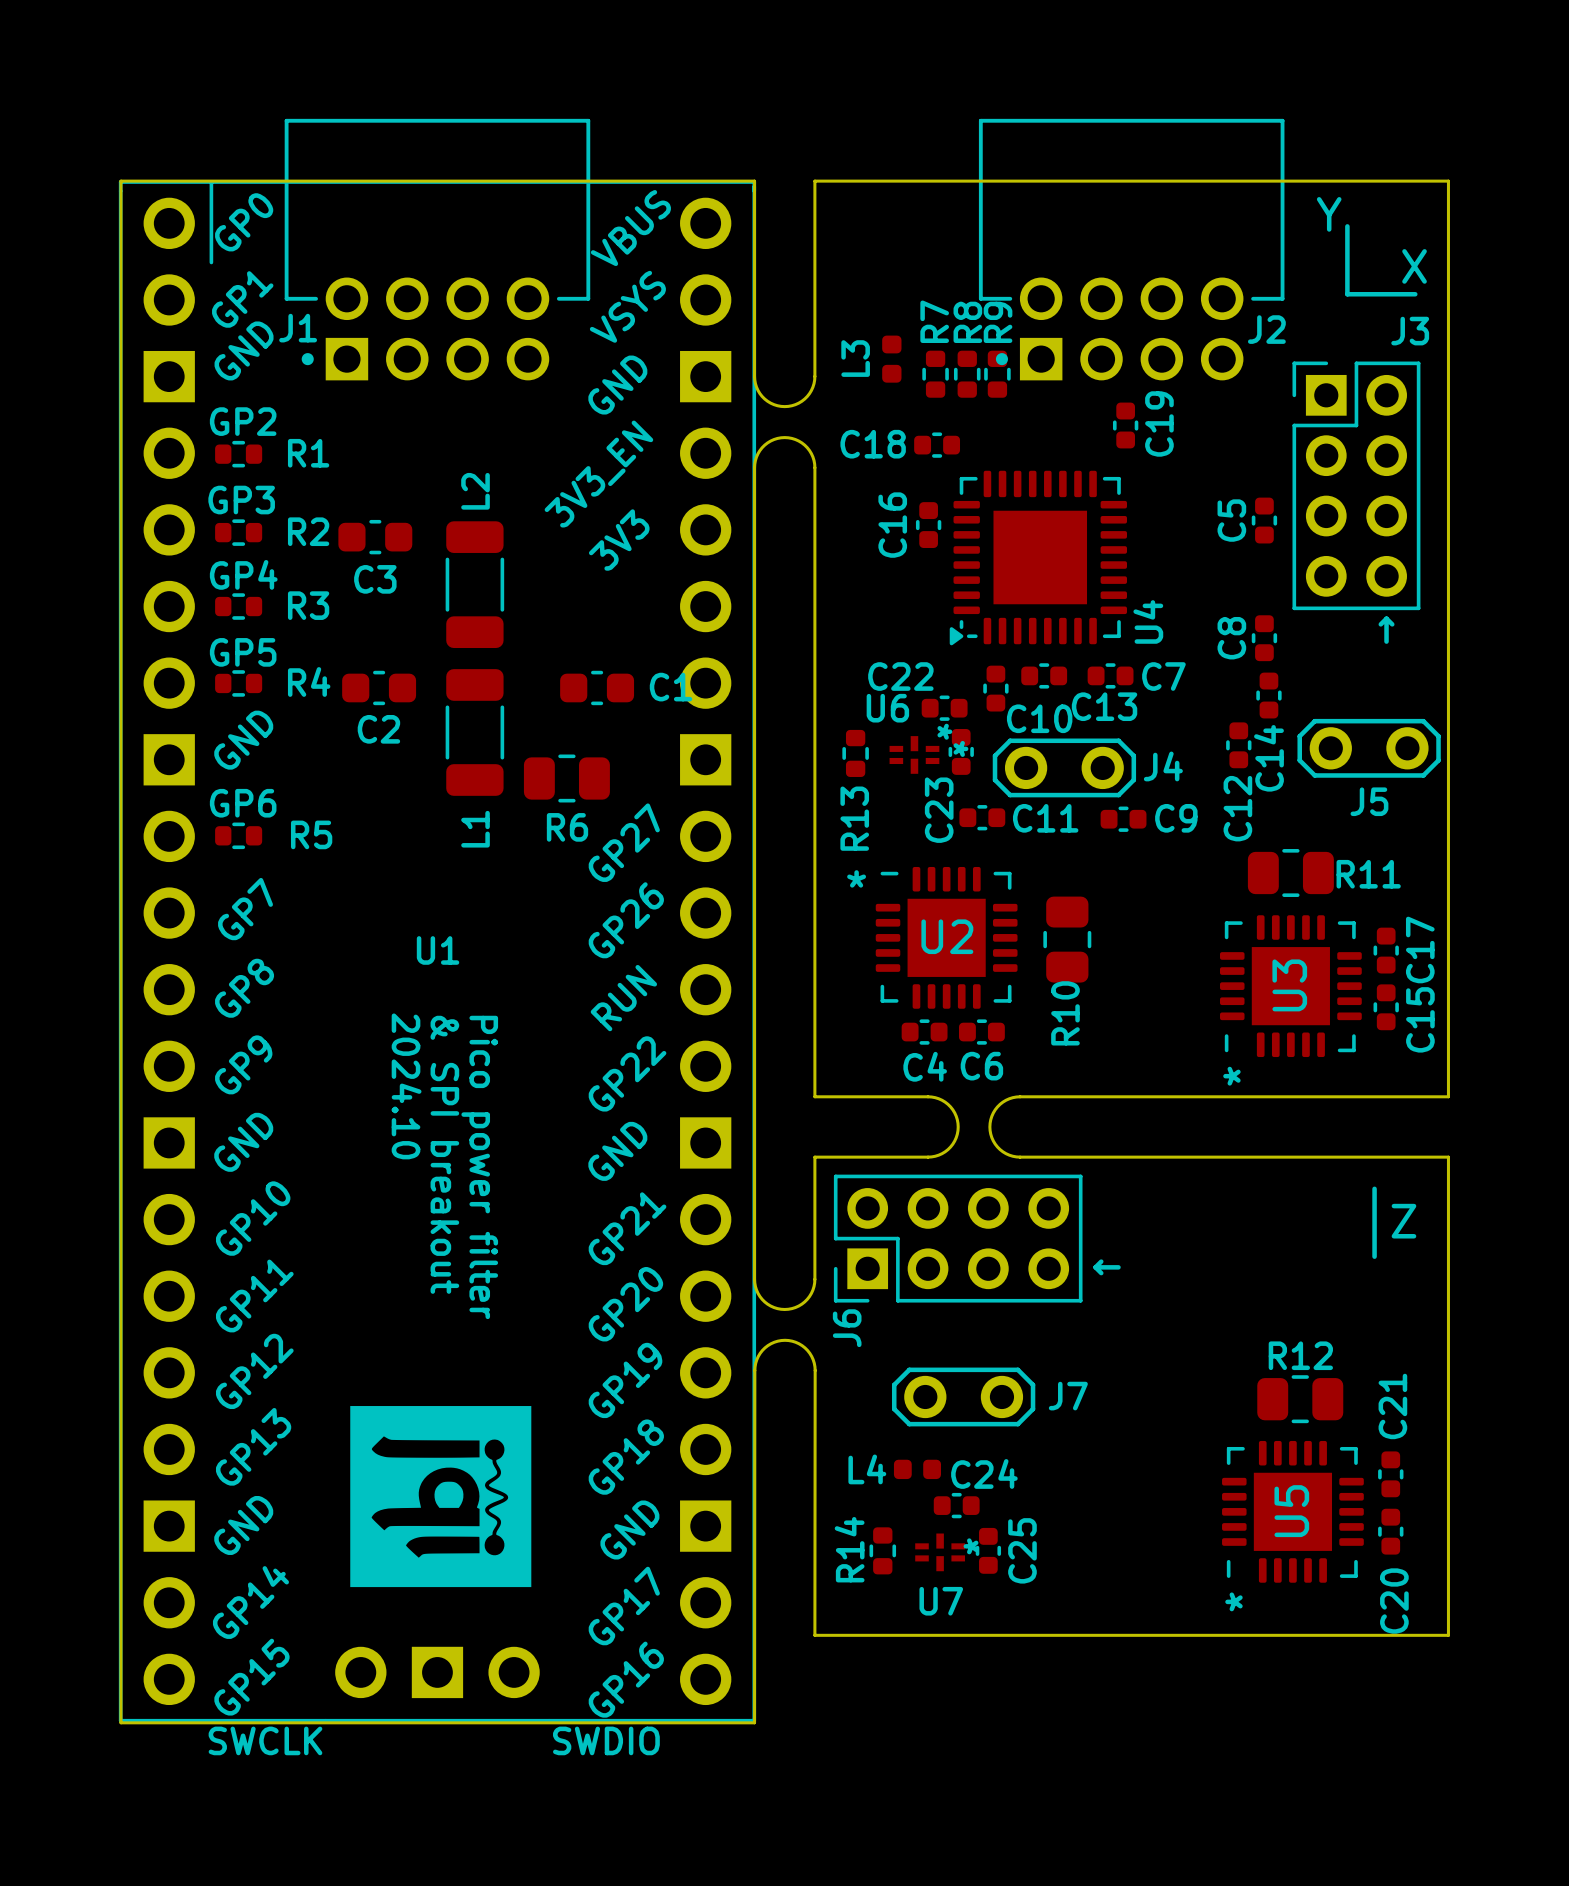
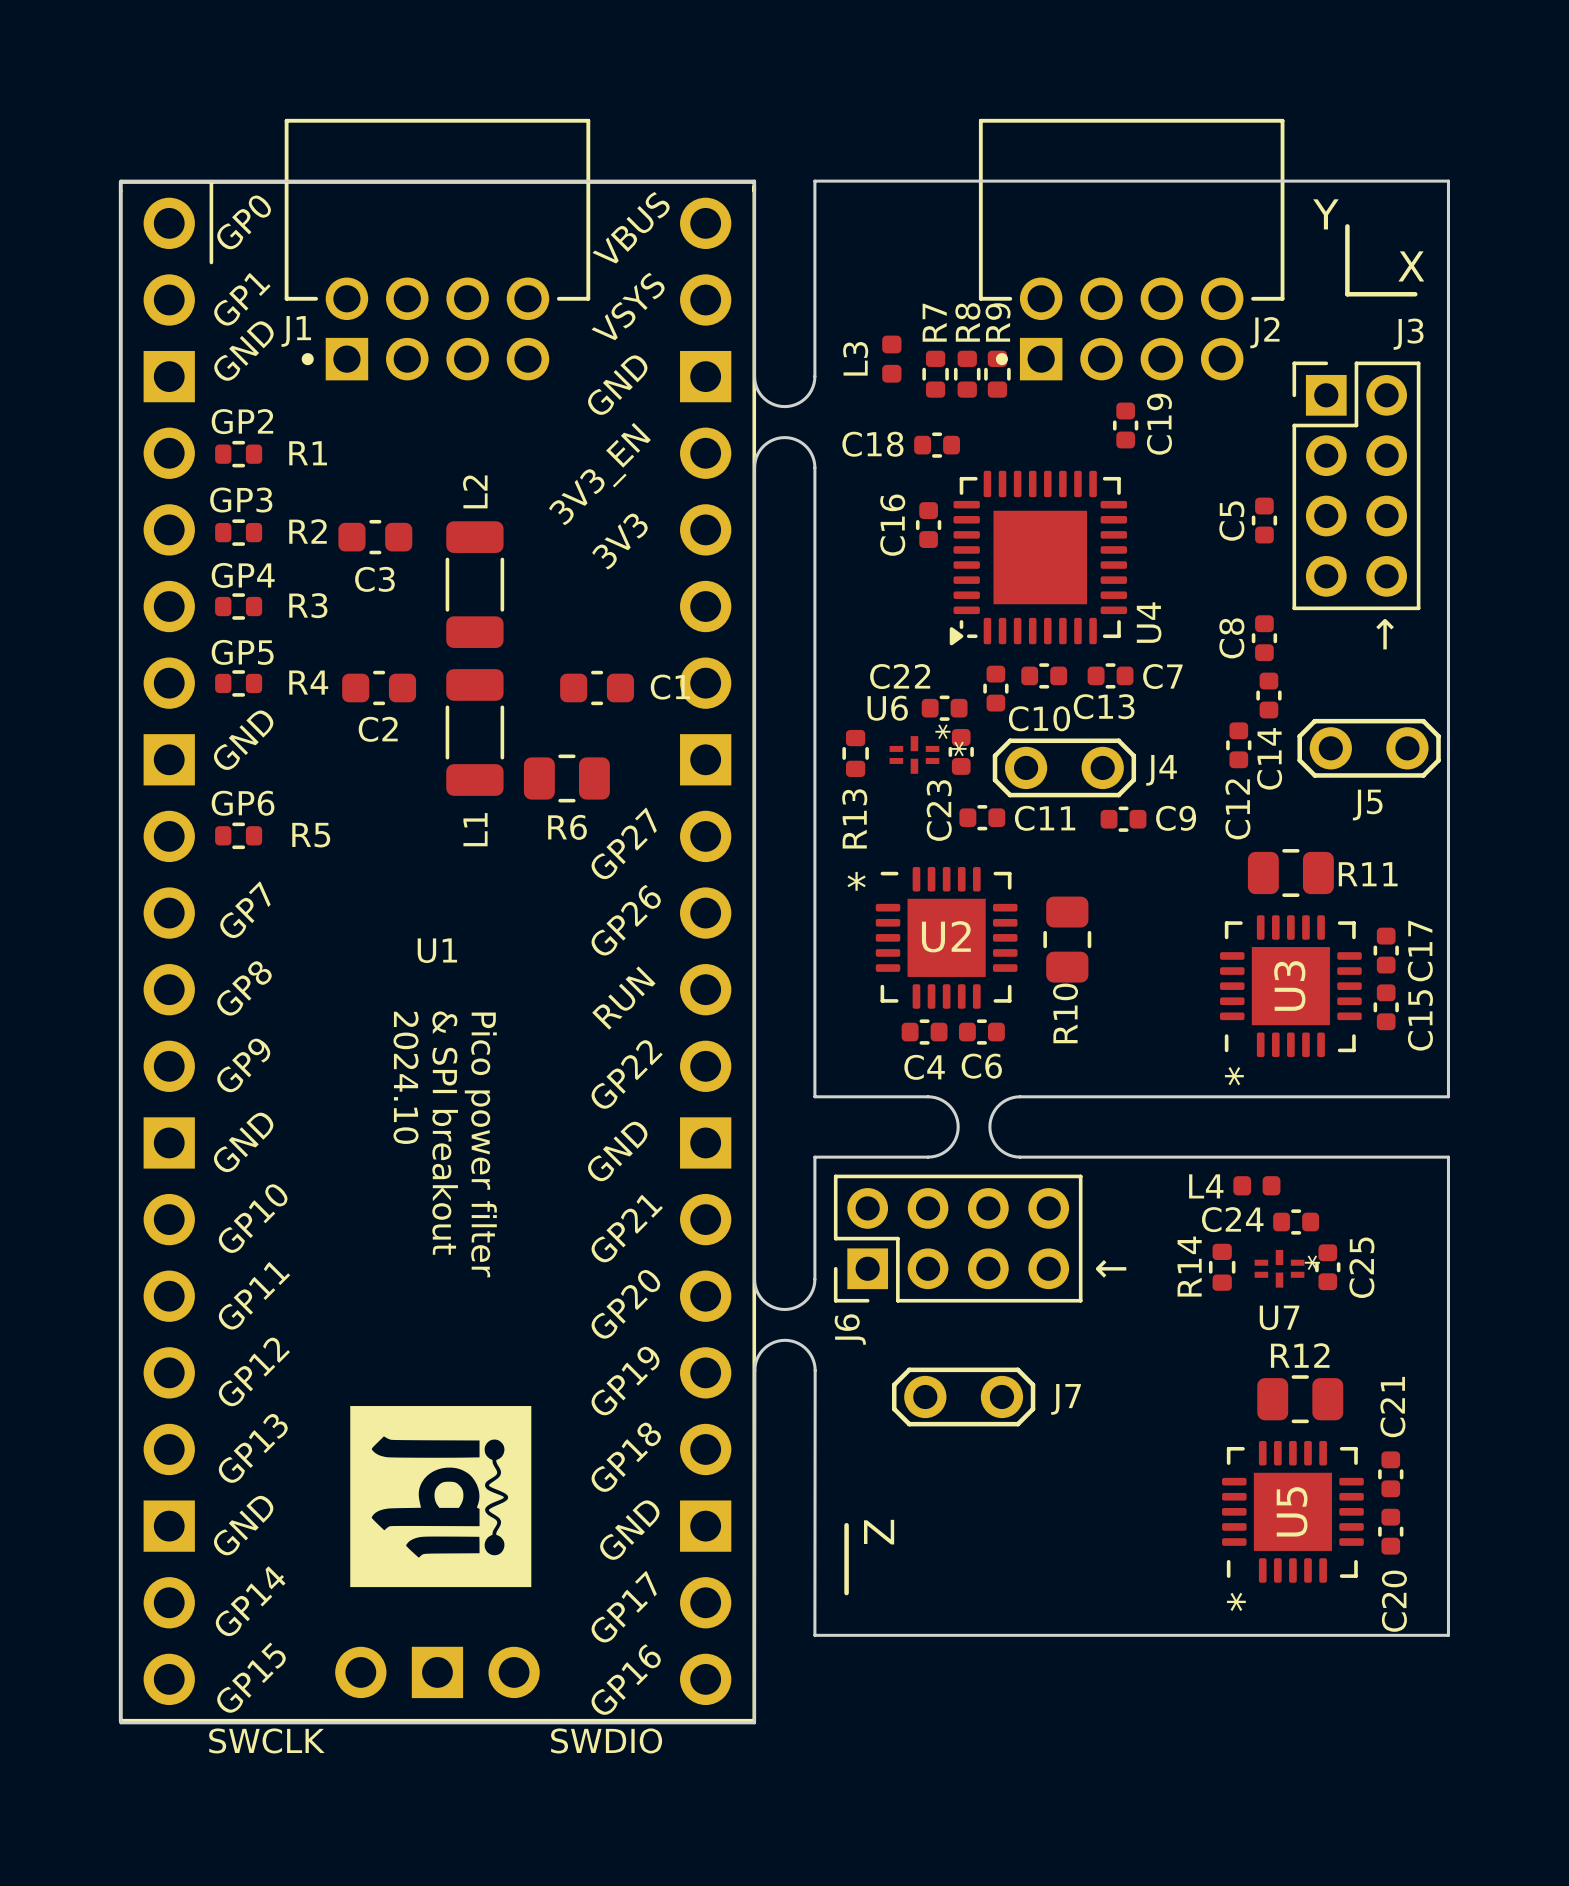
line: (1374, 1188) (1374, 1256) -> (846, 1525) (846, 1593)
text rotation: 0° (1403, 1221) -> 90° clockwise (879, 1532)
text position: Z (1403, 1221) -> Z (879, 1532)
L4 position: (917, 1469) -> (1256, 1185)
C24 name position: C24 (984, 1473) -> C24 (1232, 1219)
C24 position: (956, 1505) -> (1296, 1222)
R14 position: (882, 1550) -> (1222, 1267)
C25 position: (988, 1550) -> (1327, 1267)
U7 position: (940, 1552) -> (1279, 1268)

